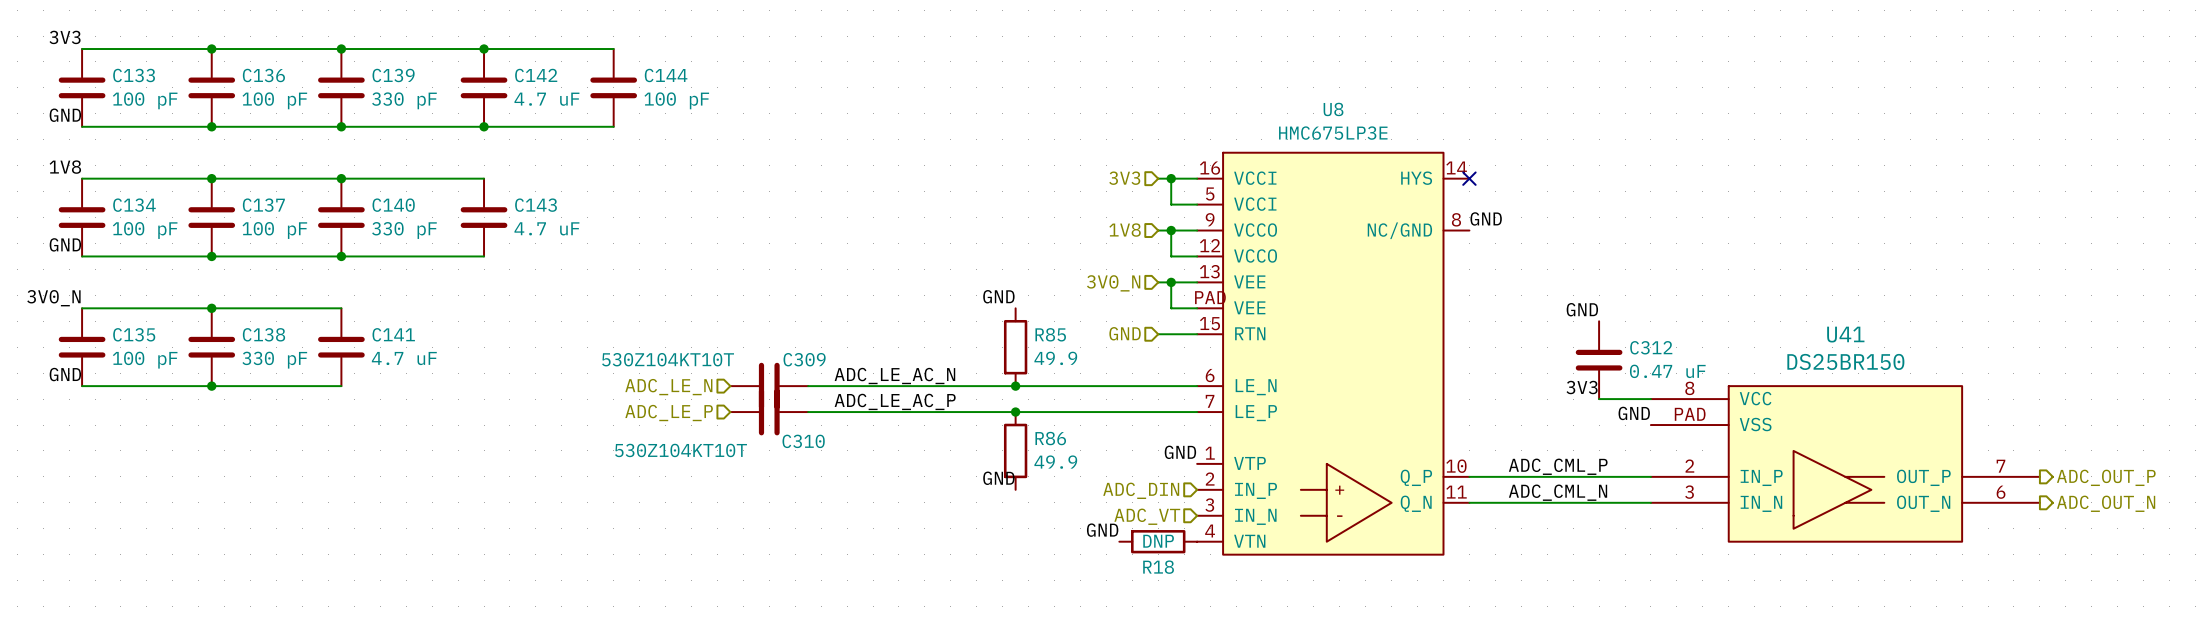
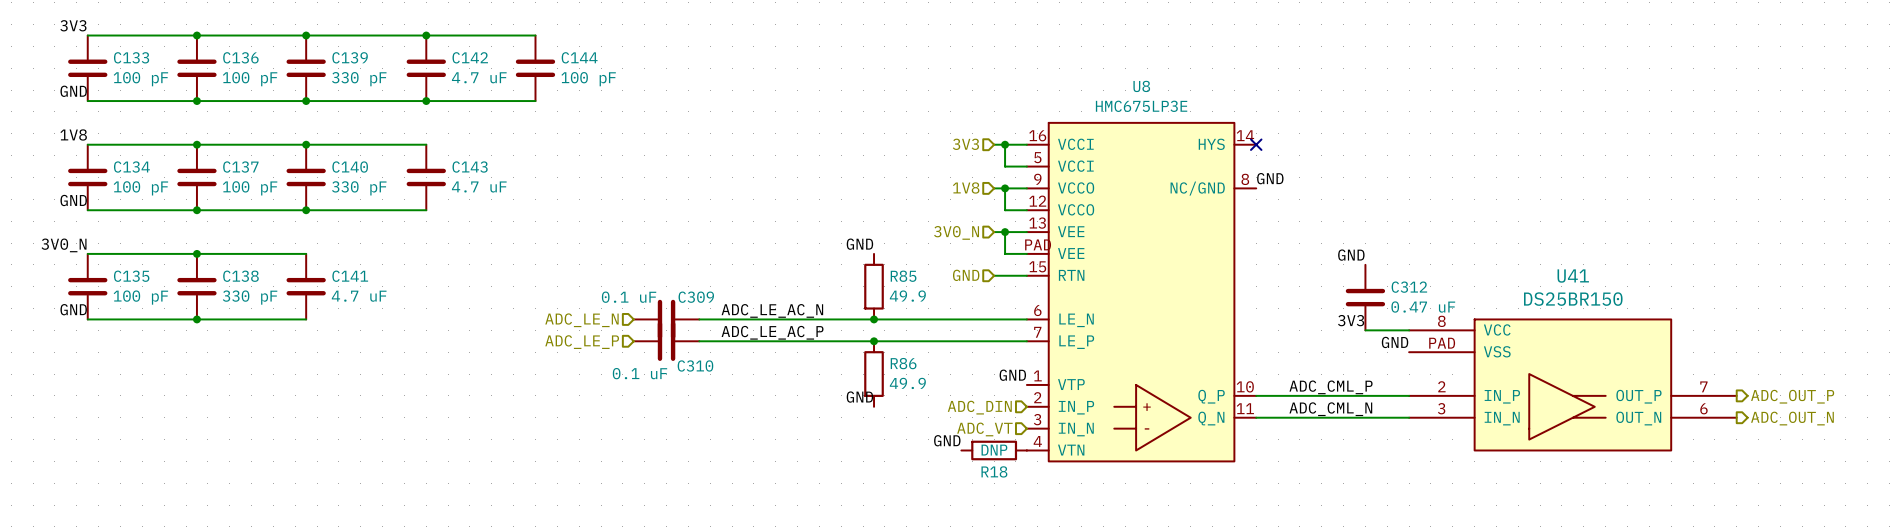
C309 value: 530Z104KT10T (668, 359) -> 0.1 uF (629, 297)
C310 value: 530Z104KT10T (681, 450) -> 0.1 uF (639, 373)

